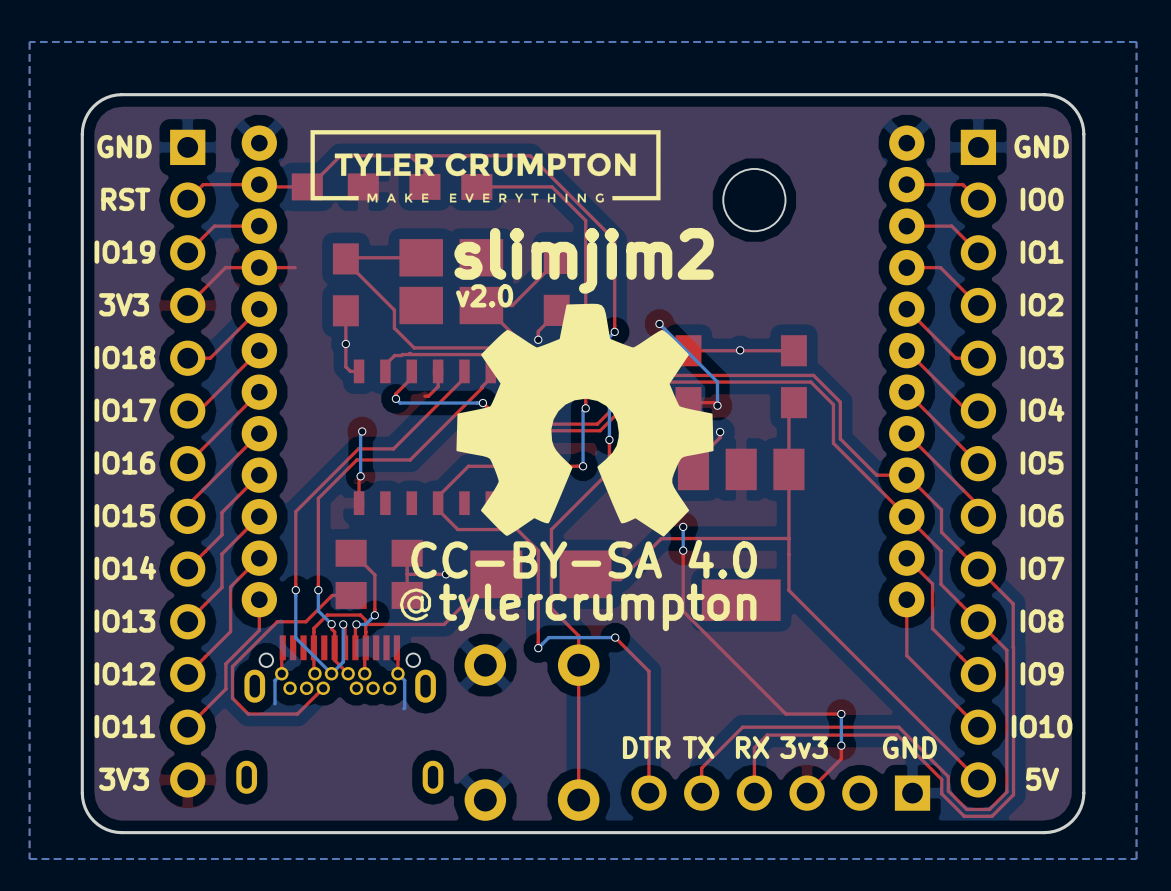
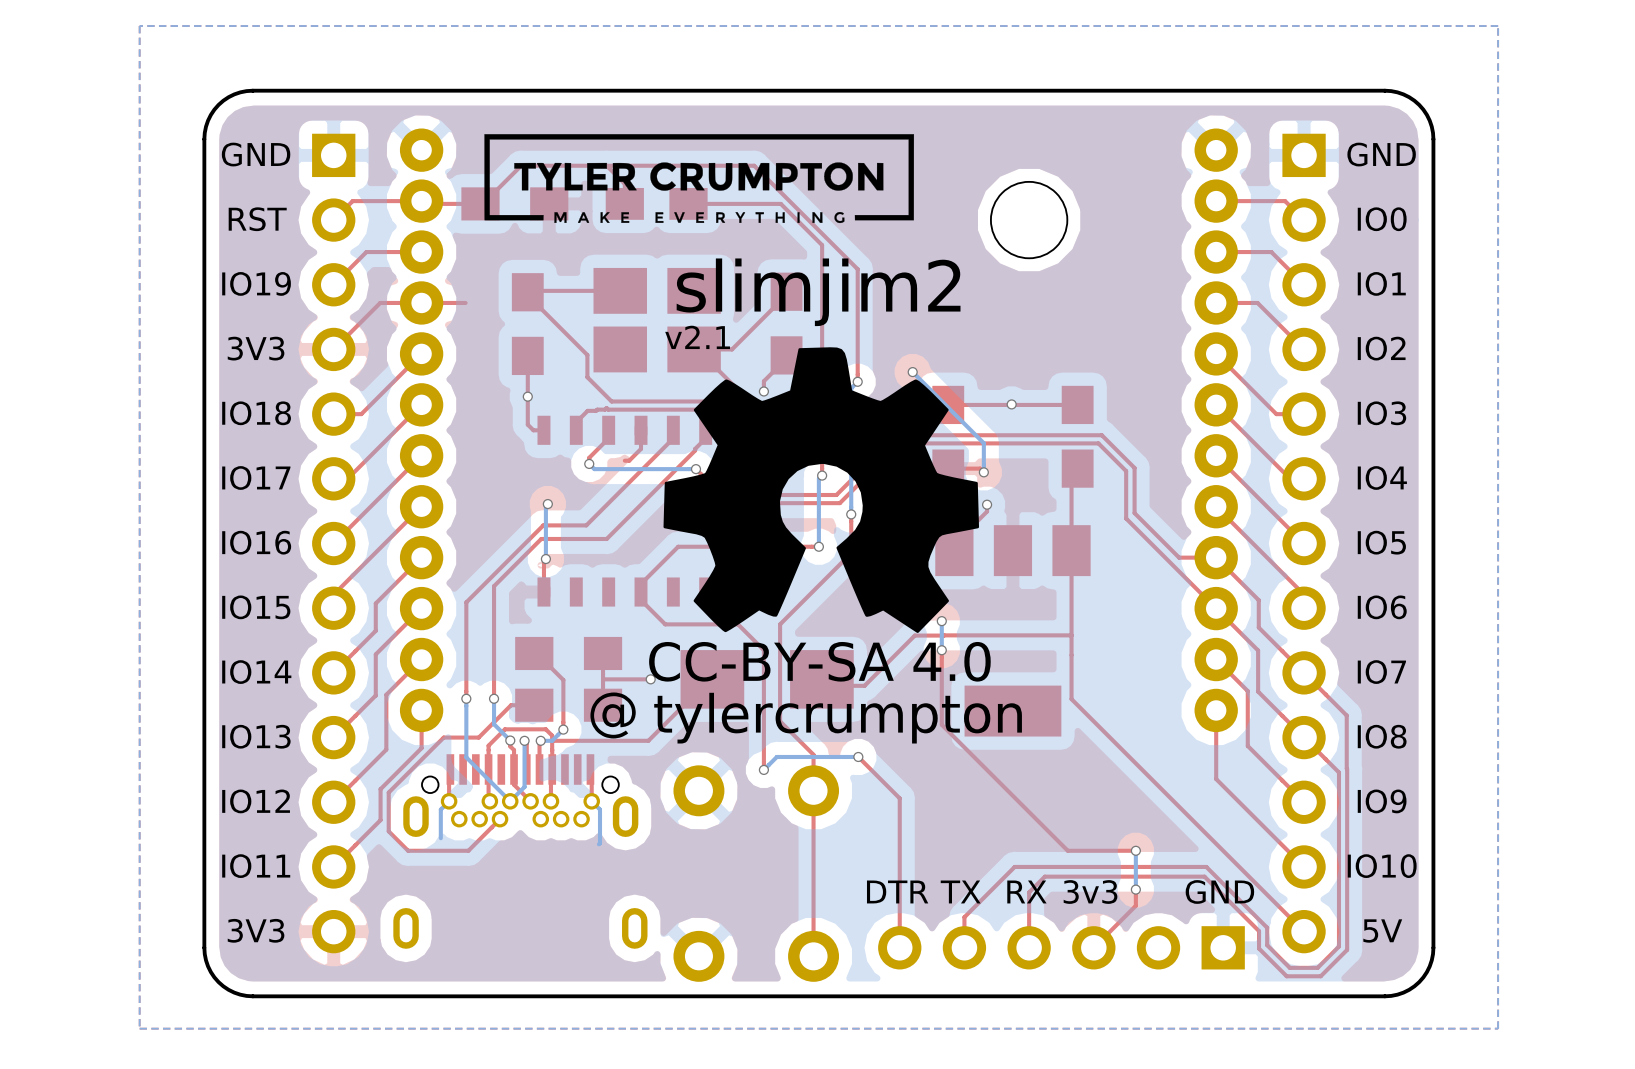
text: v2.0 (484, 295) -> v2.1 (697, 337)

